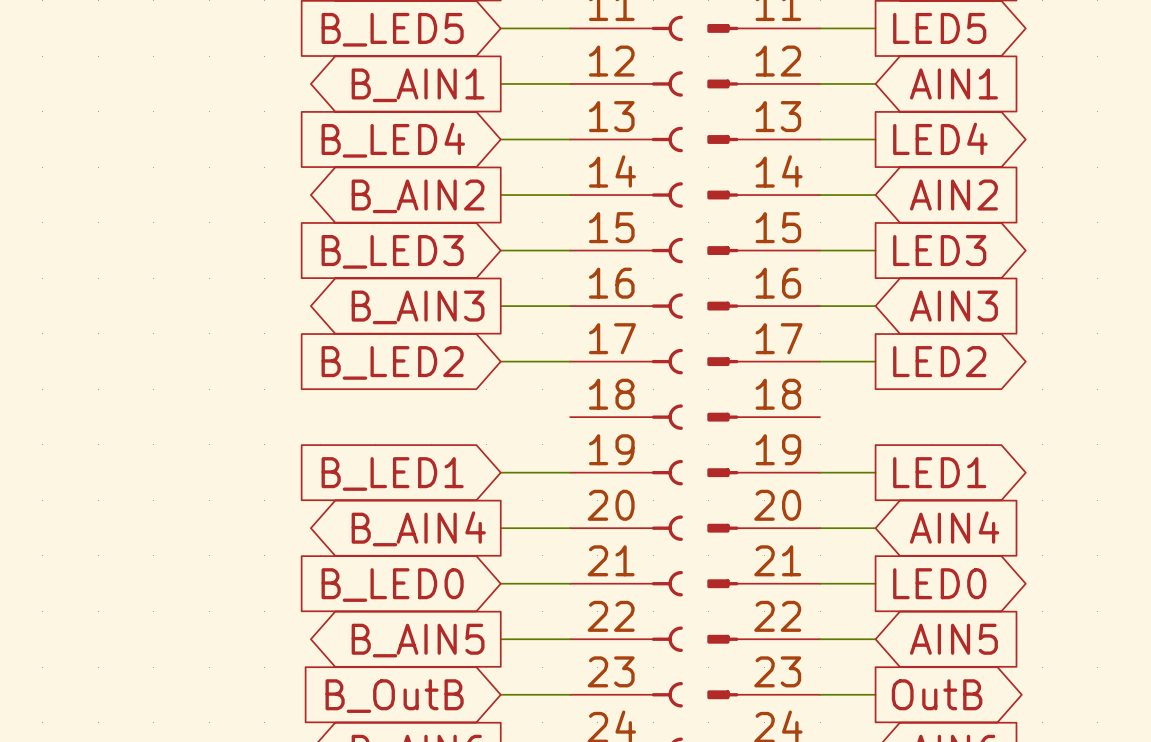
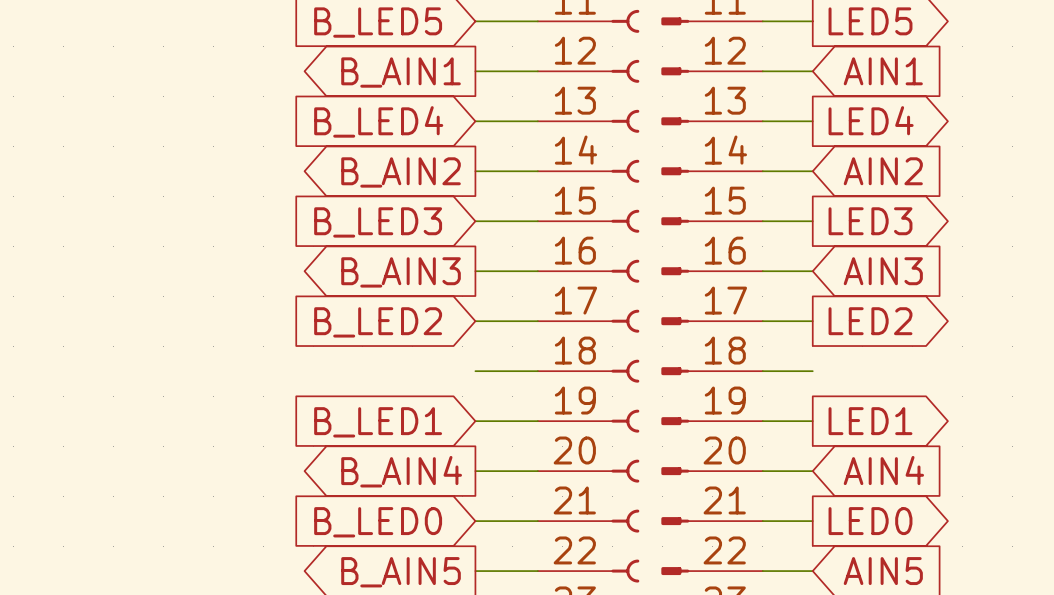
wire: none -> (475, 371) (537, 371)
wire: none -> (762, 371) (812, 371)

